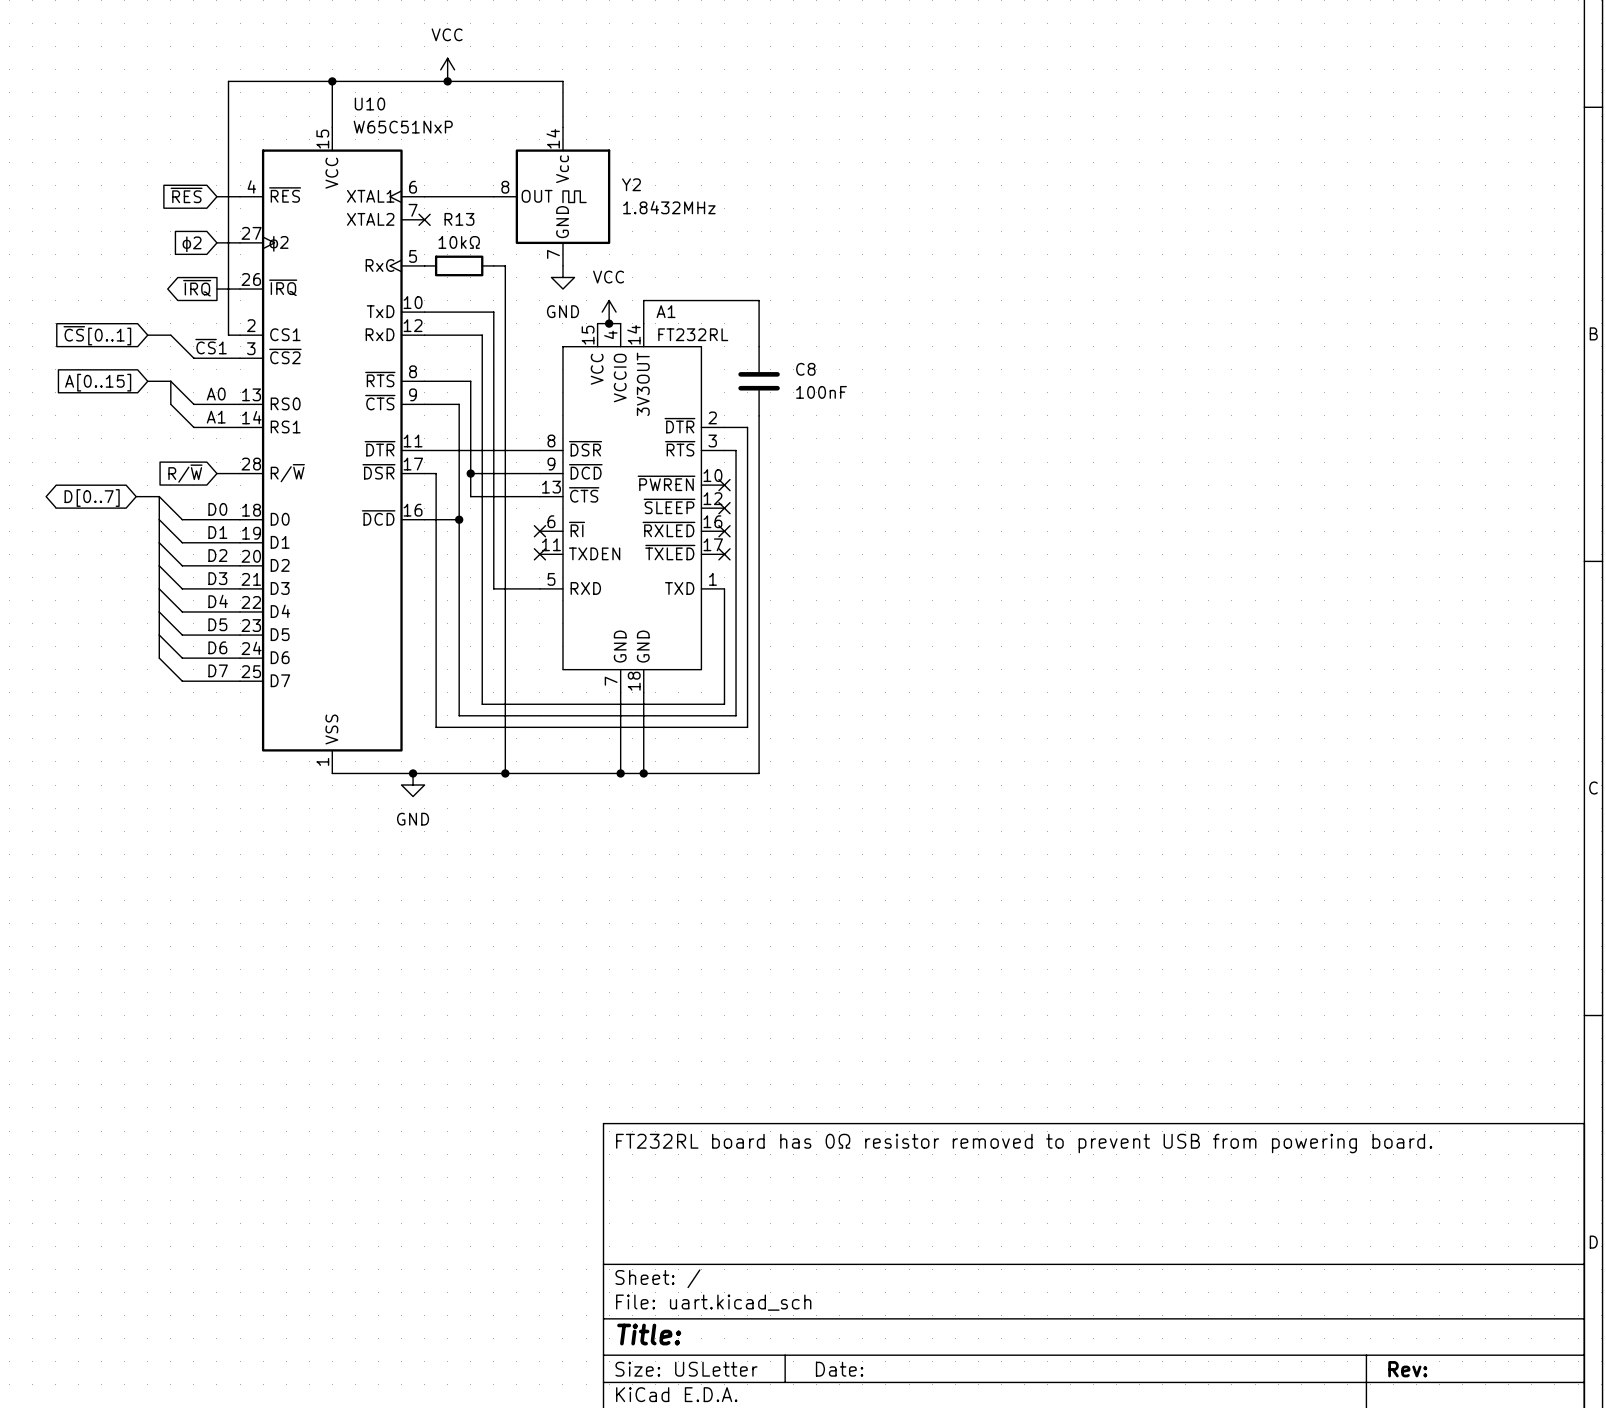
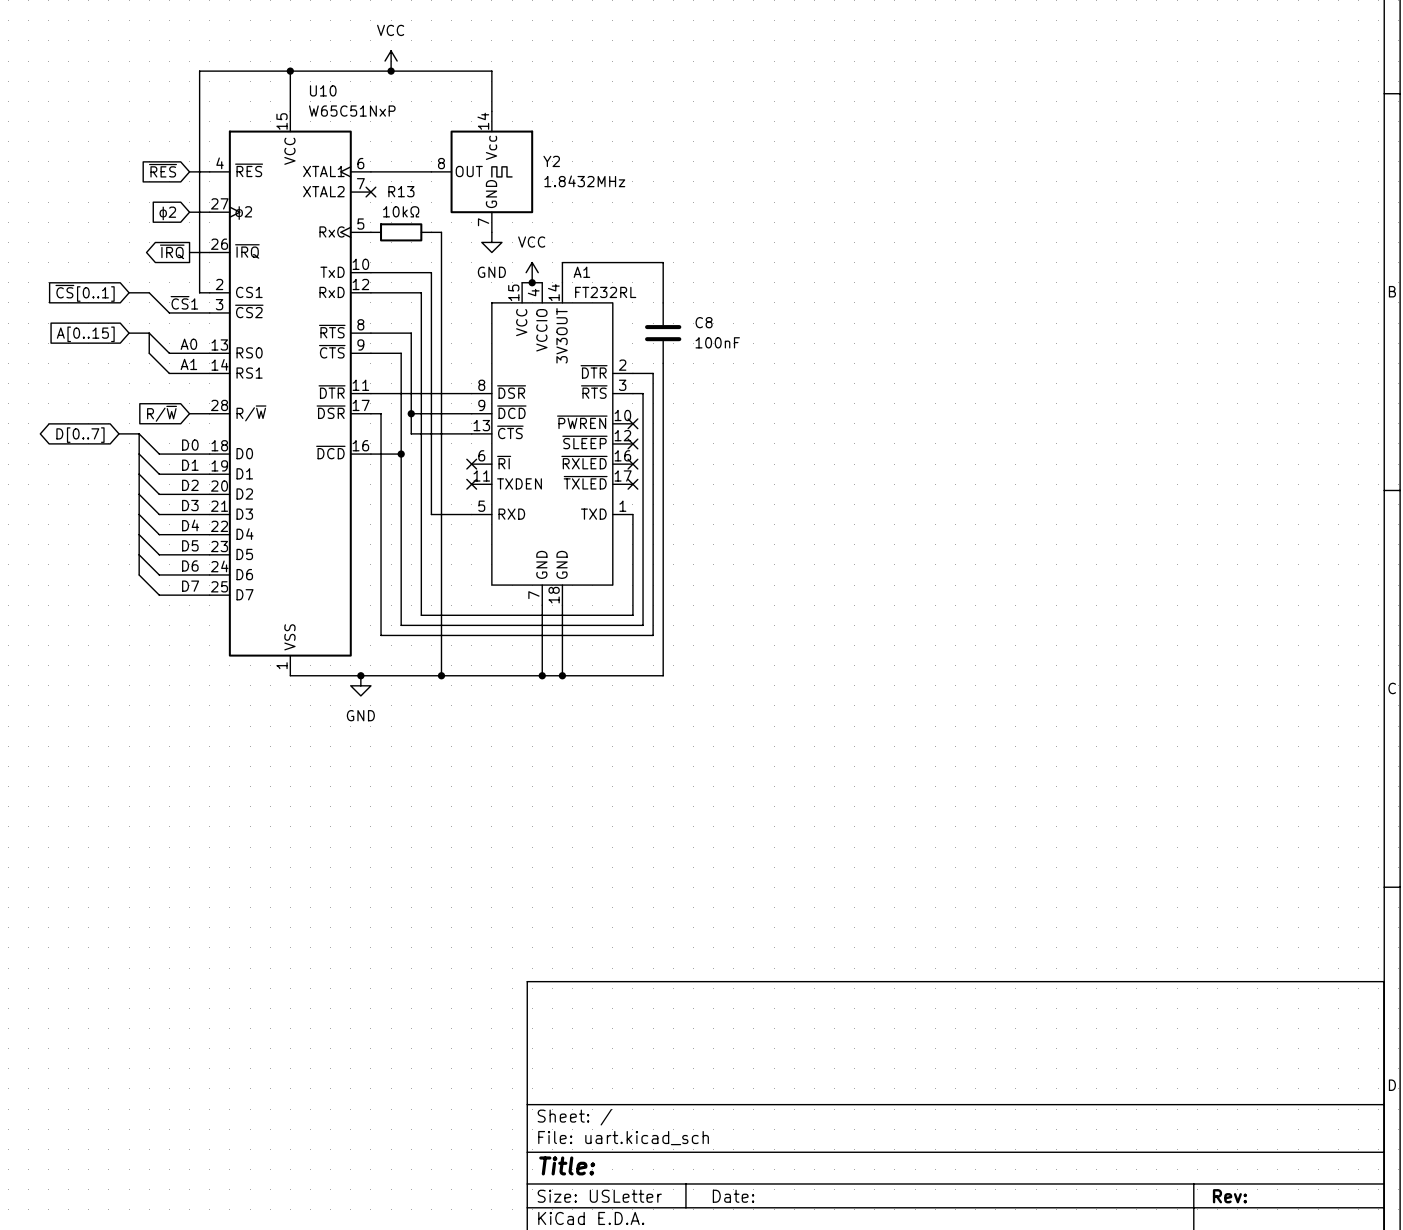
title block: FT232RL board has 0Ω resistor removed to prevent USB from powering board. (1024, 1143) -> none

